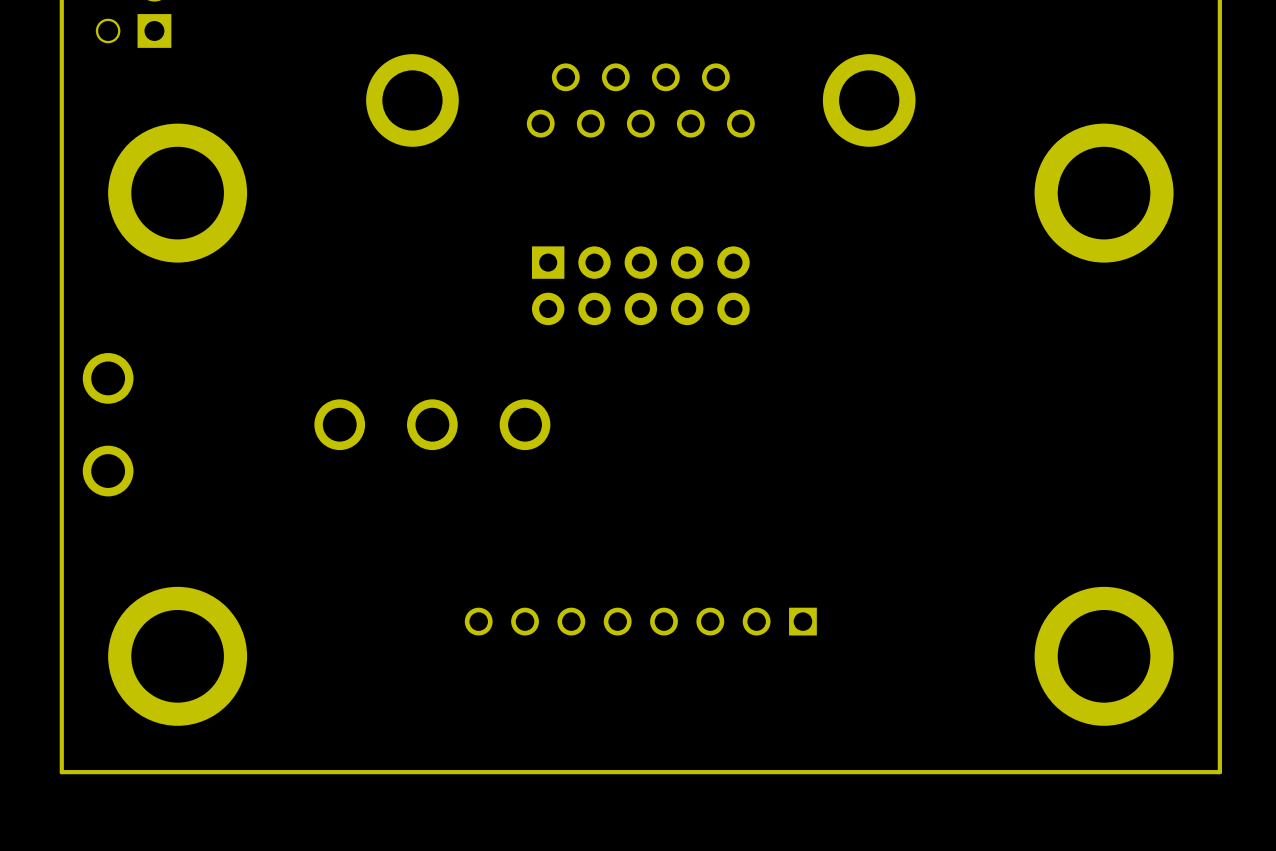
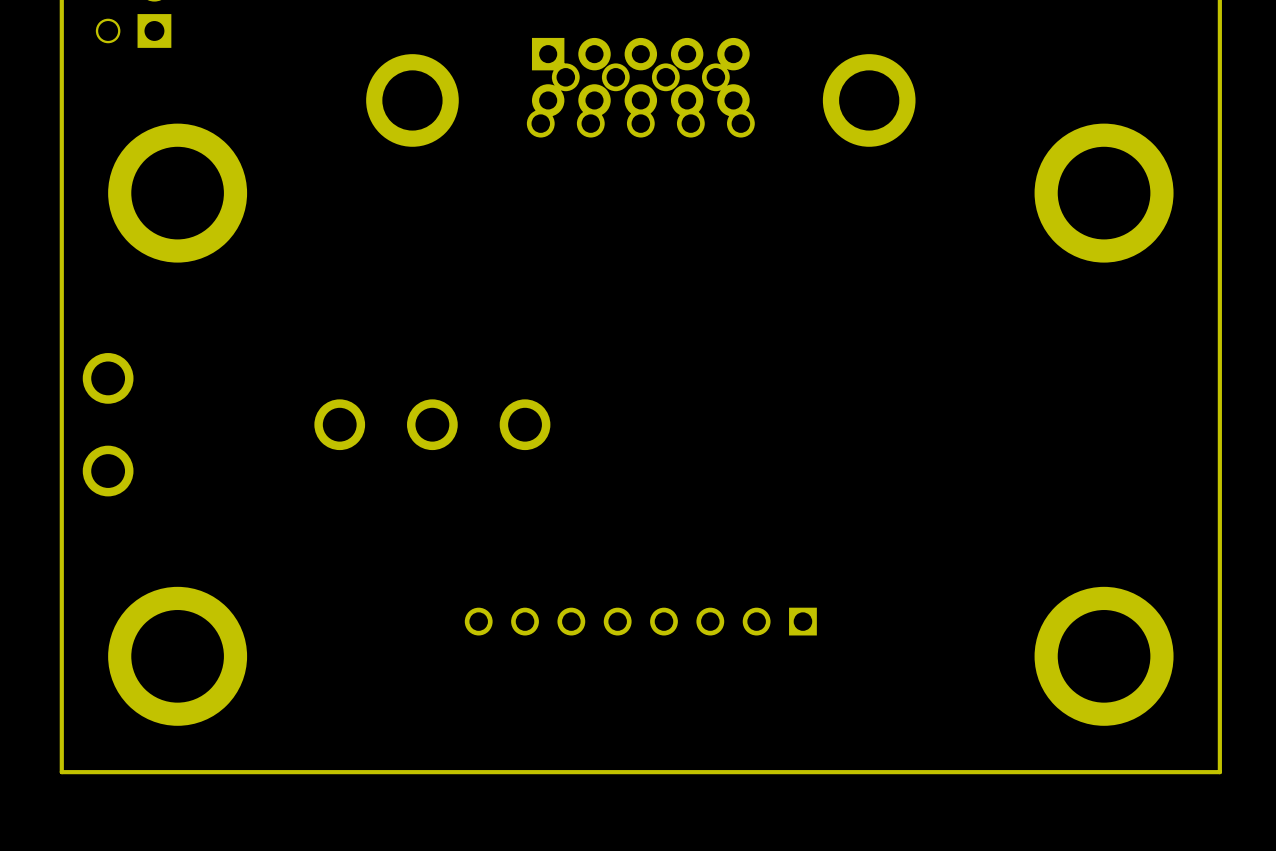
part position: (640, 285) -> (640, 77)

